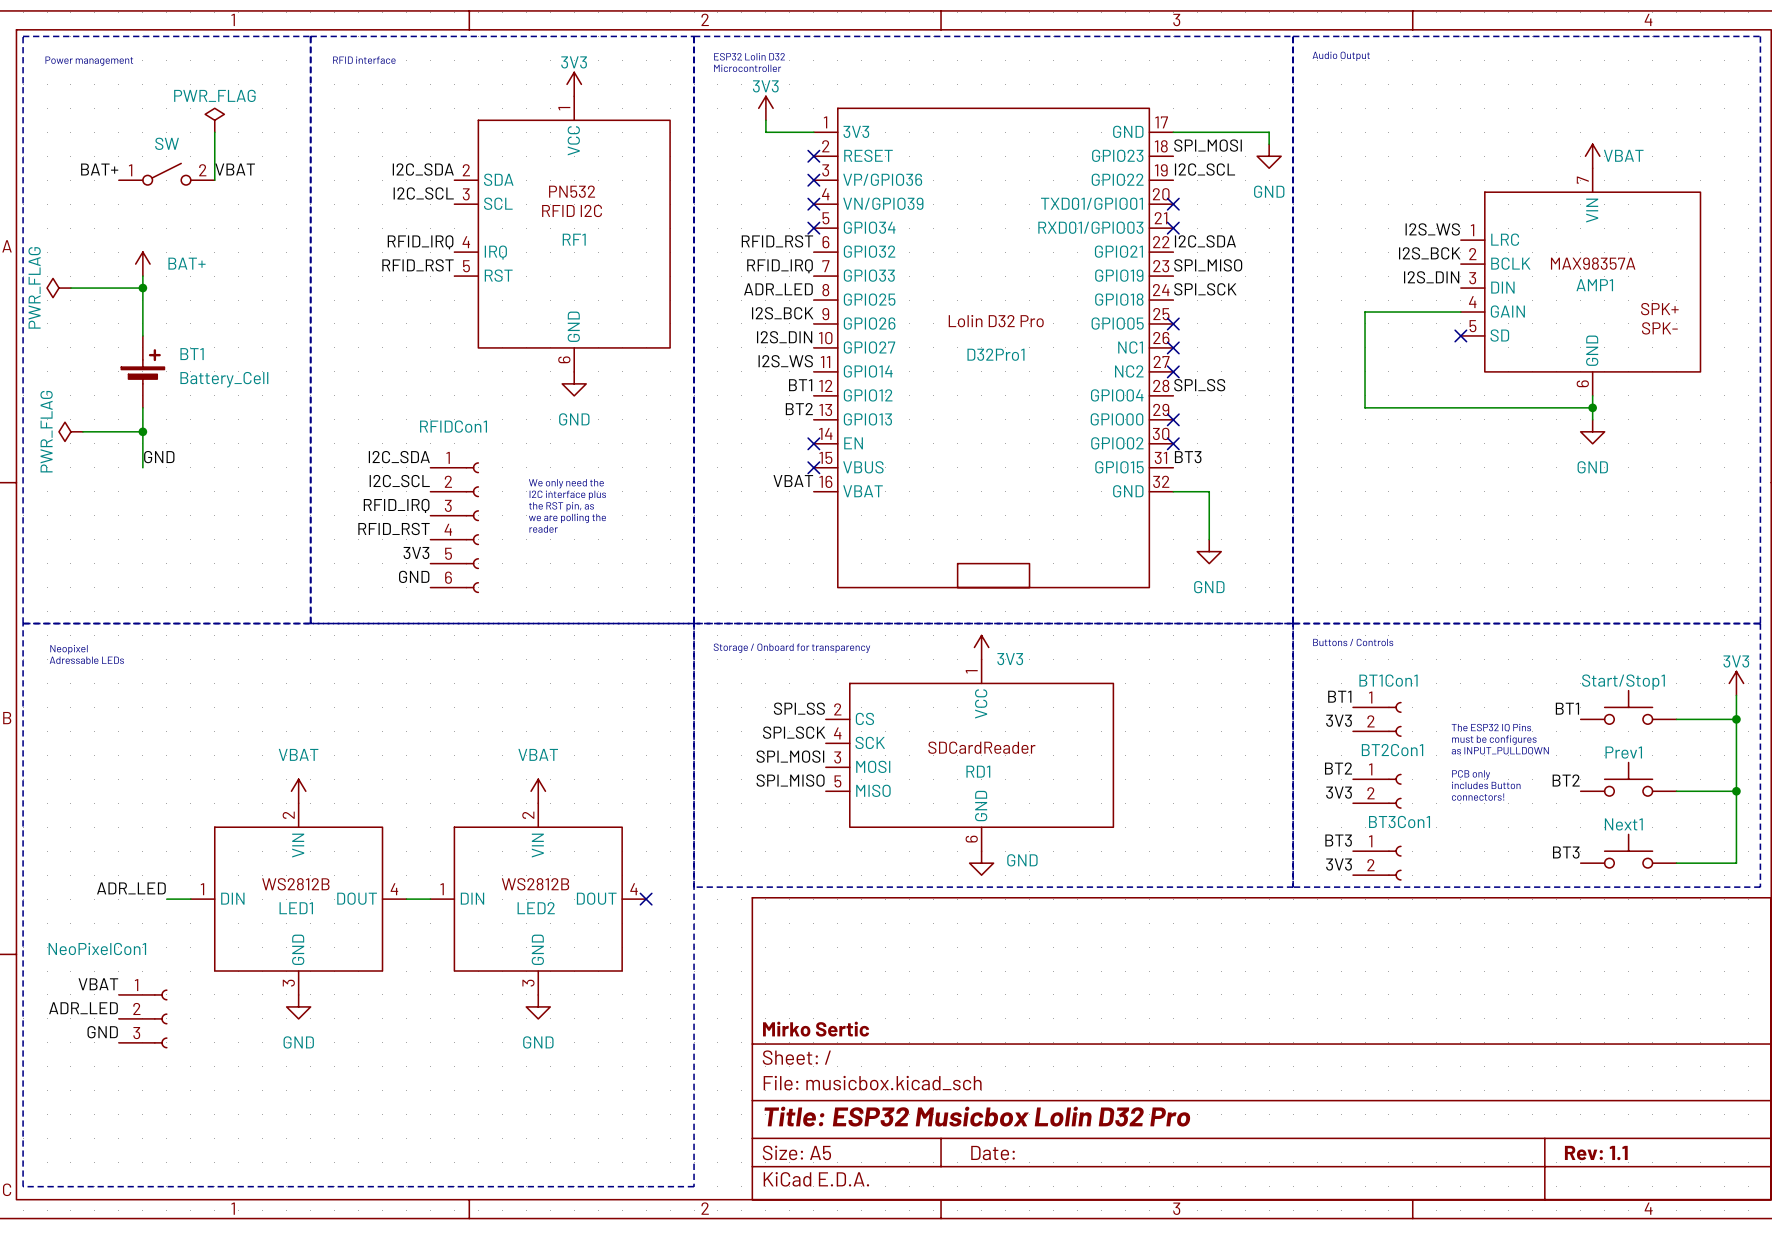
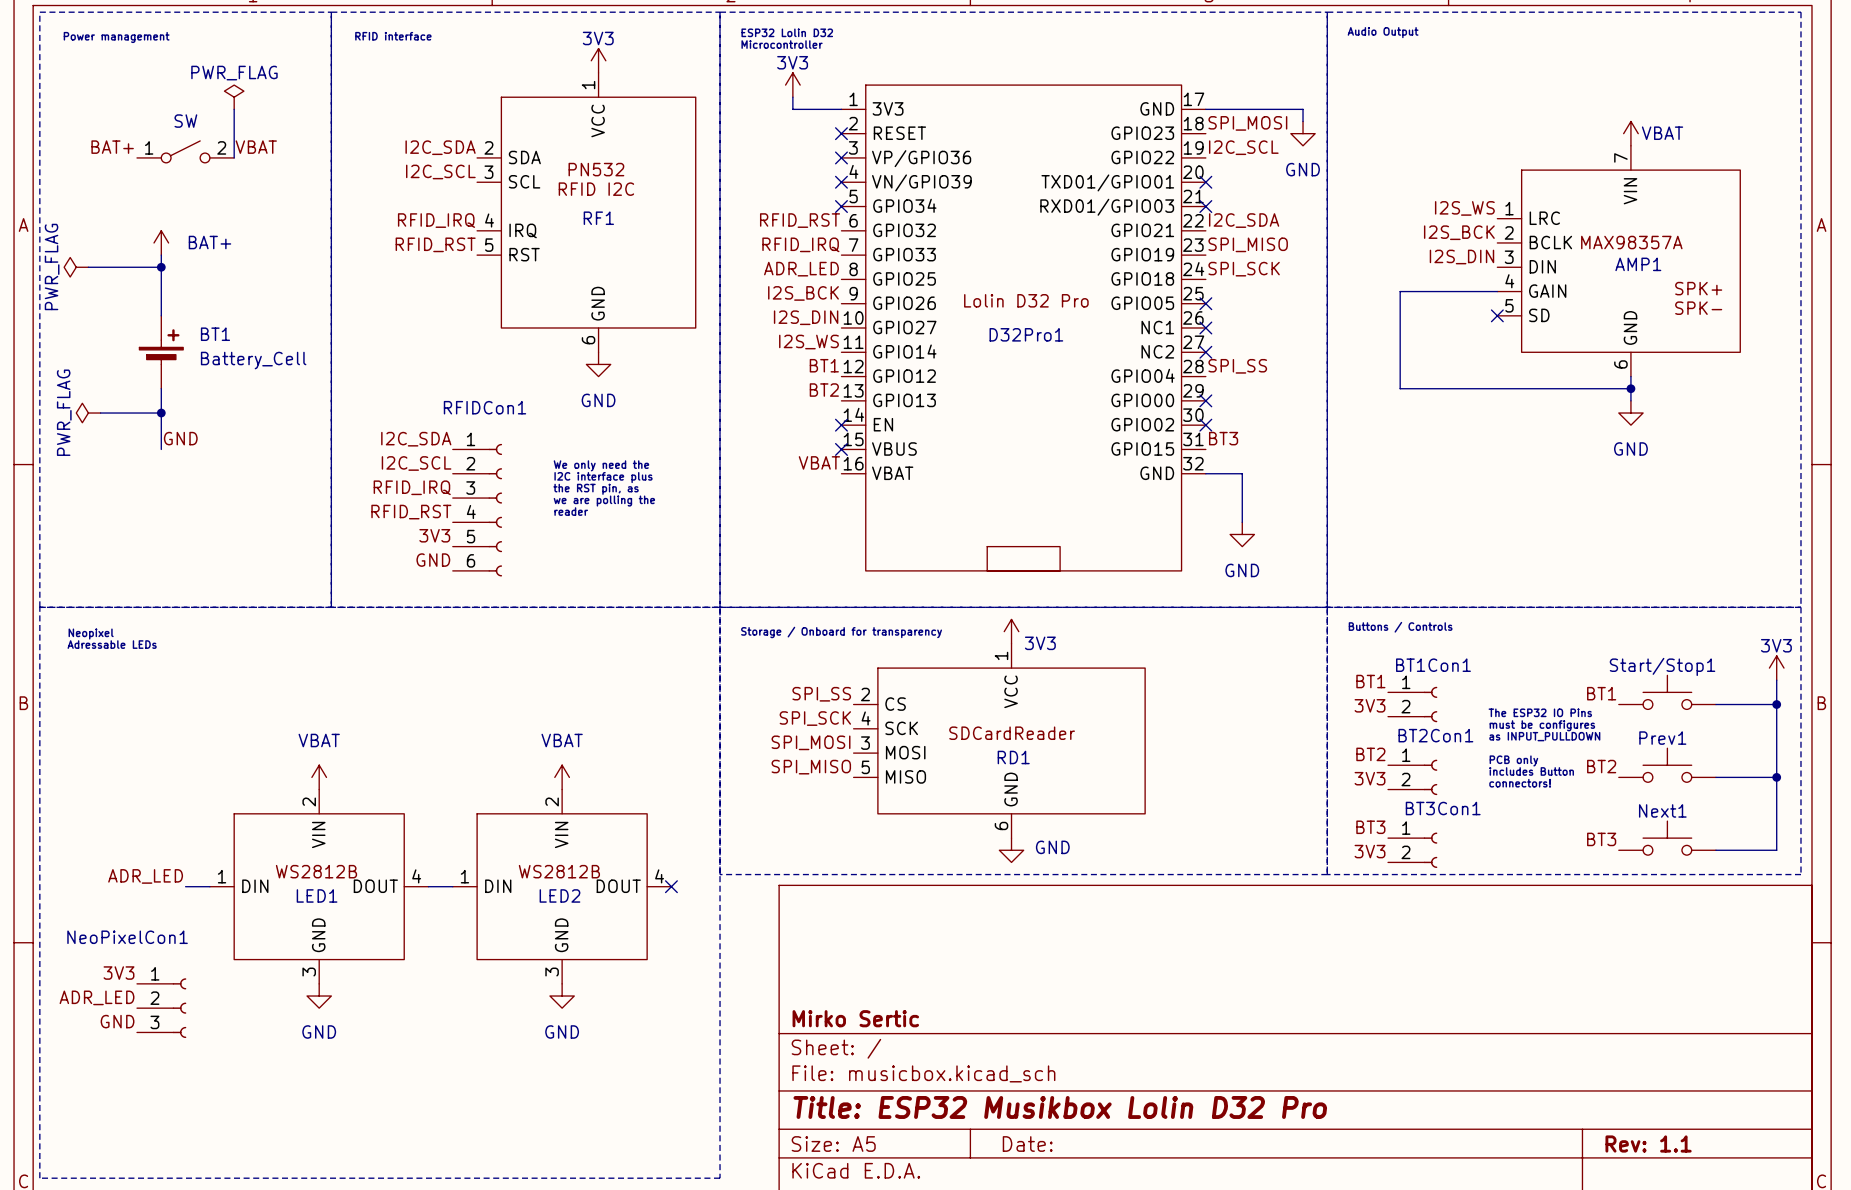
label: VBAT (98, 984) -> 3V3 (118, 973)
title block: Title: ESP32 Musicbox Lolin D32 Pro (977, 1116) -> Title: ESP32 Musikbox Lolin D32 Pro (1060, 1107)

